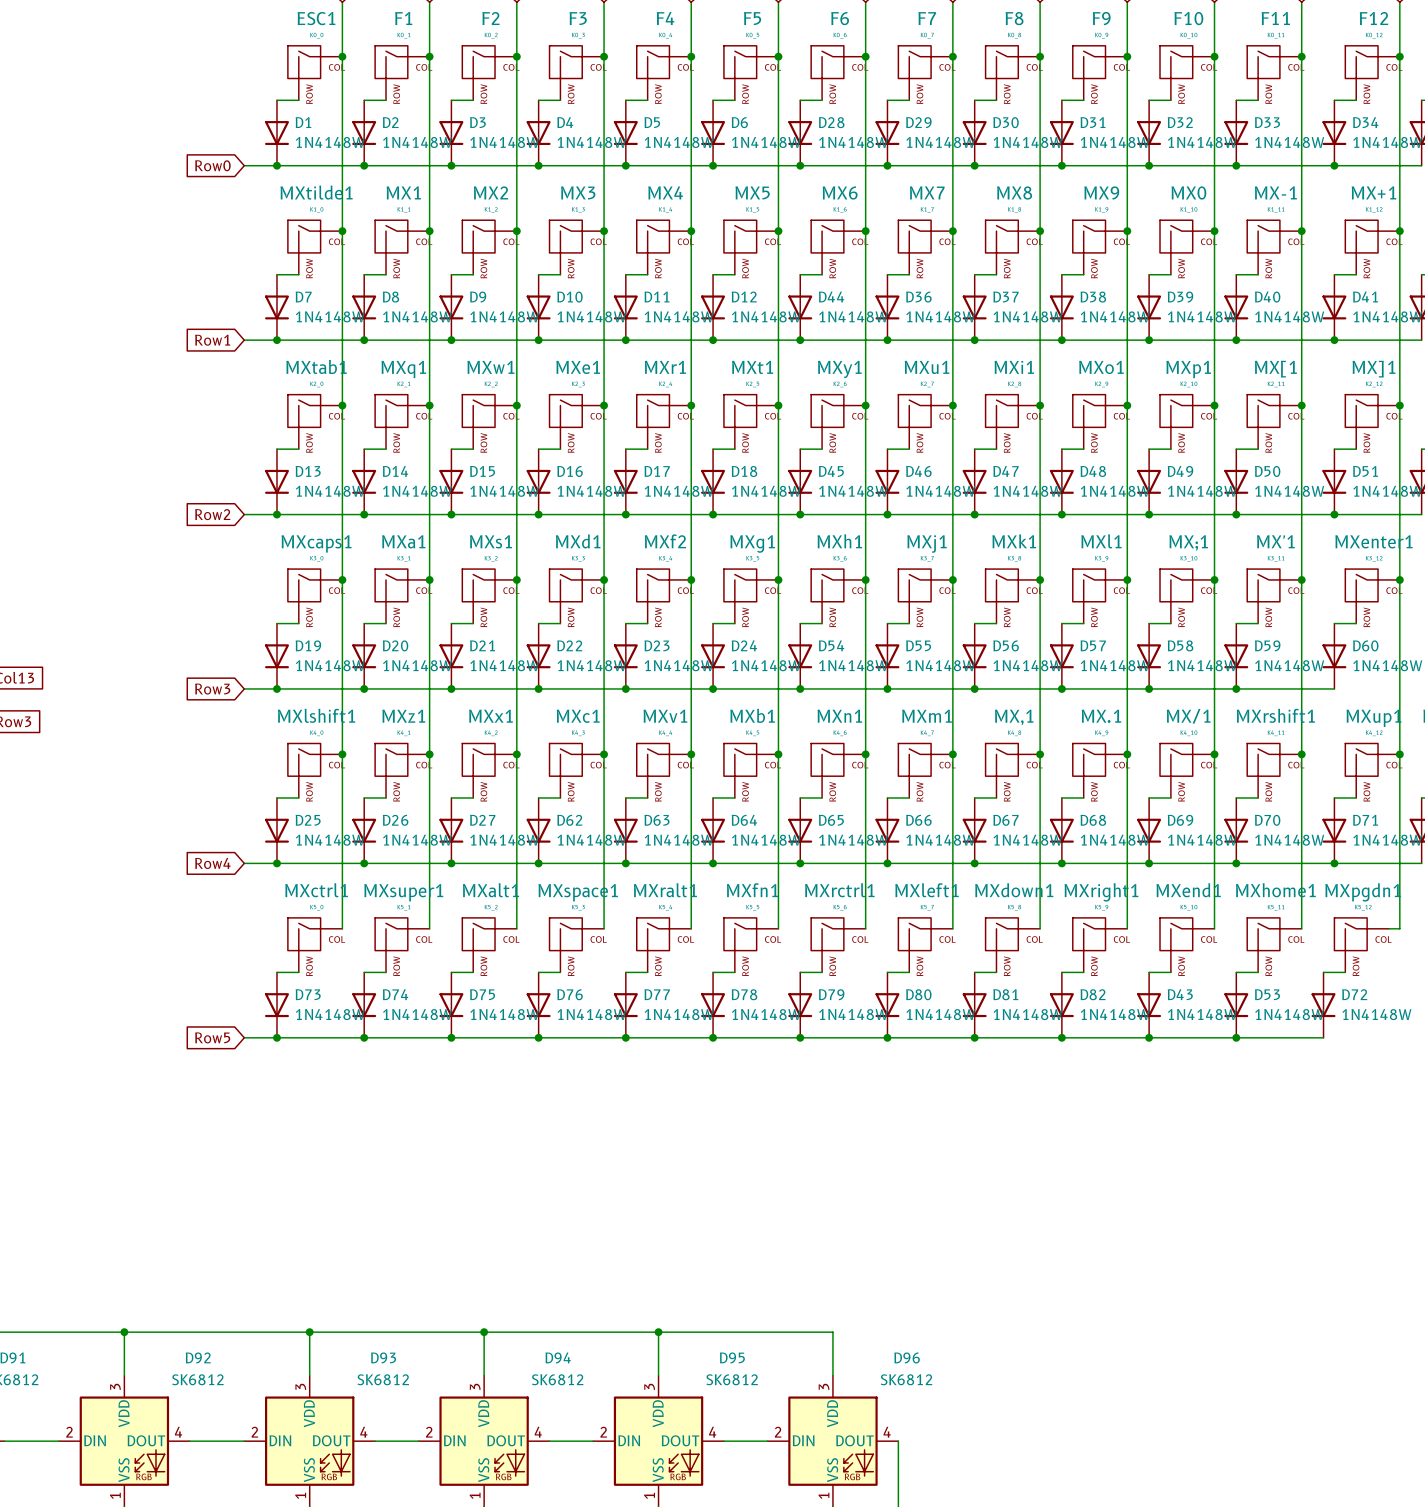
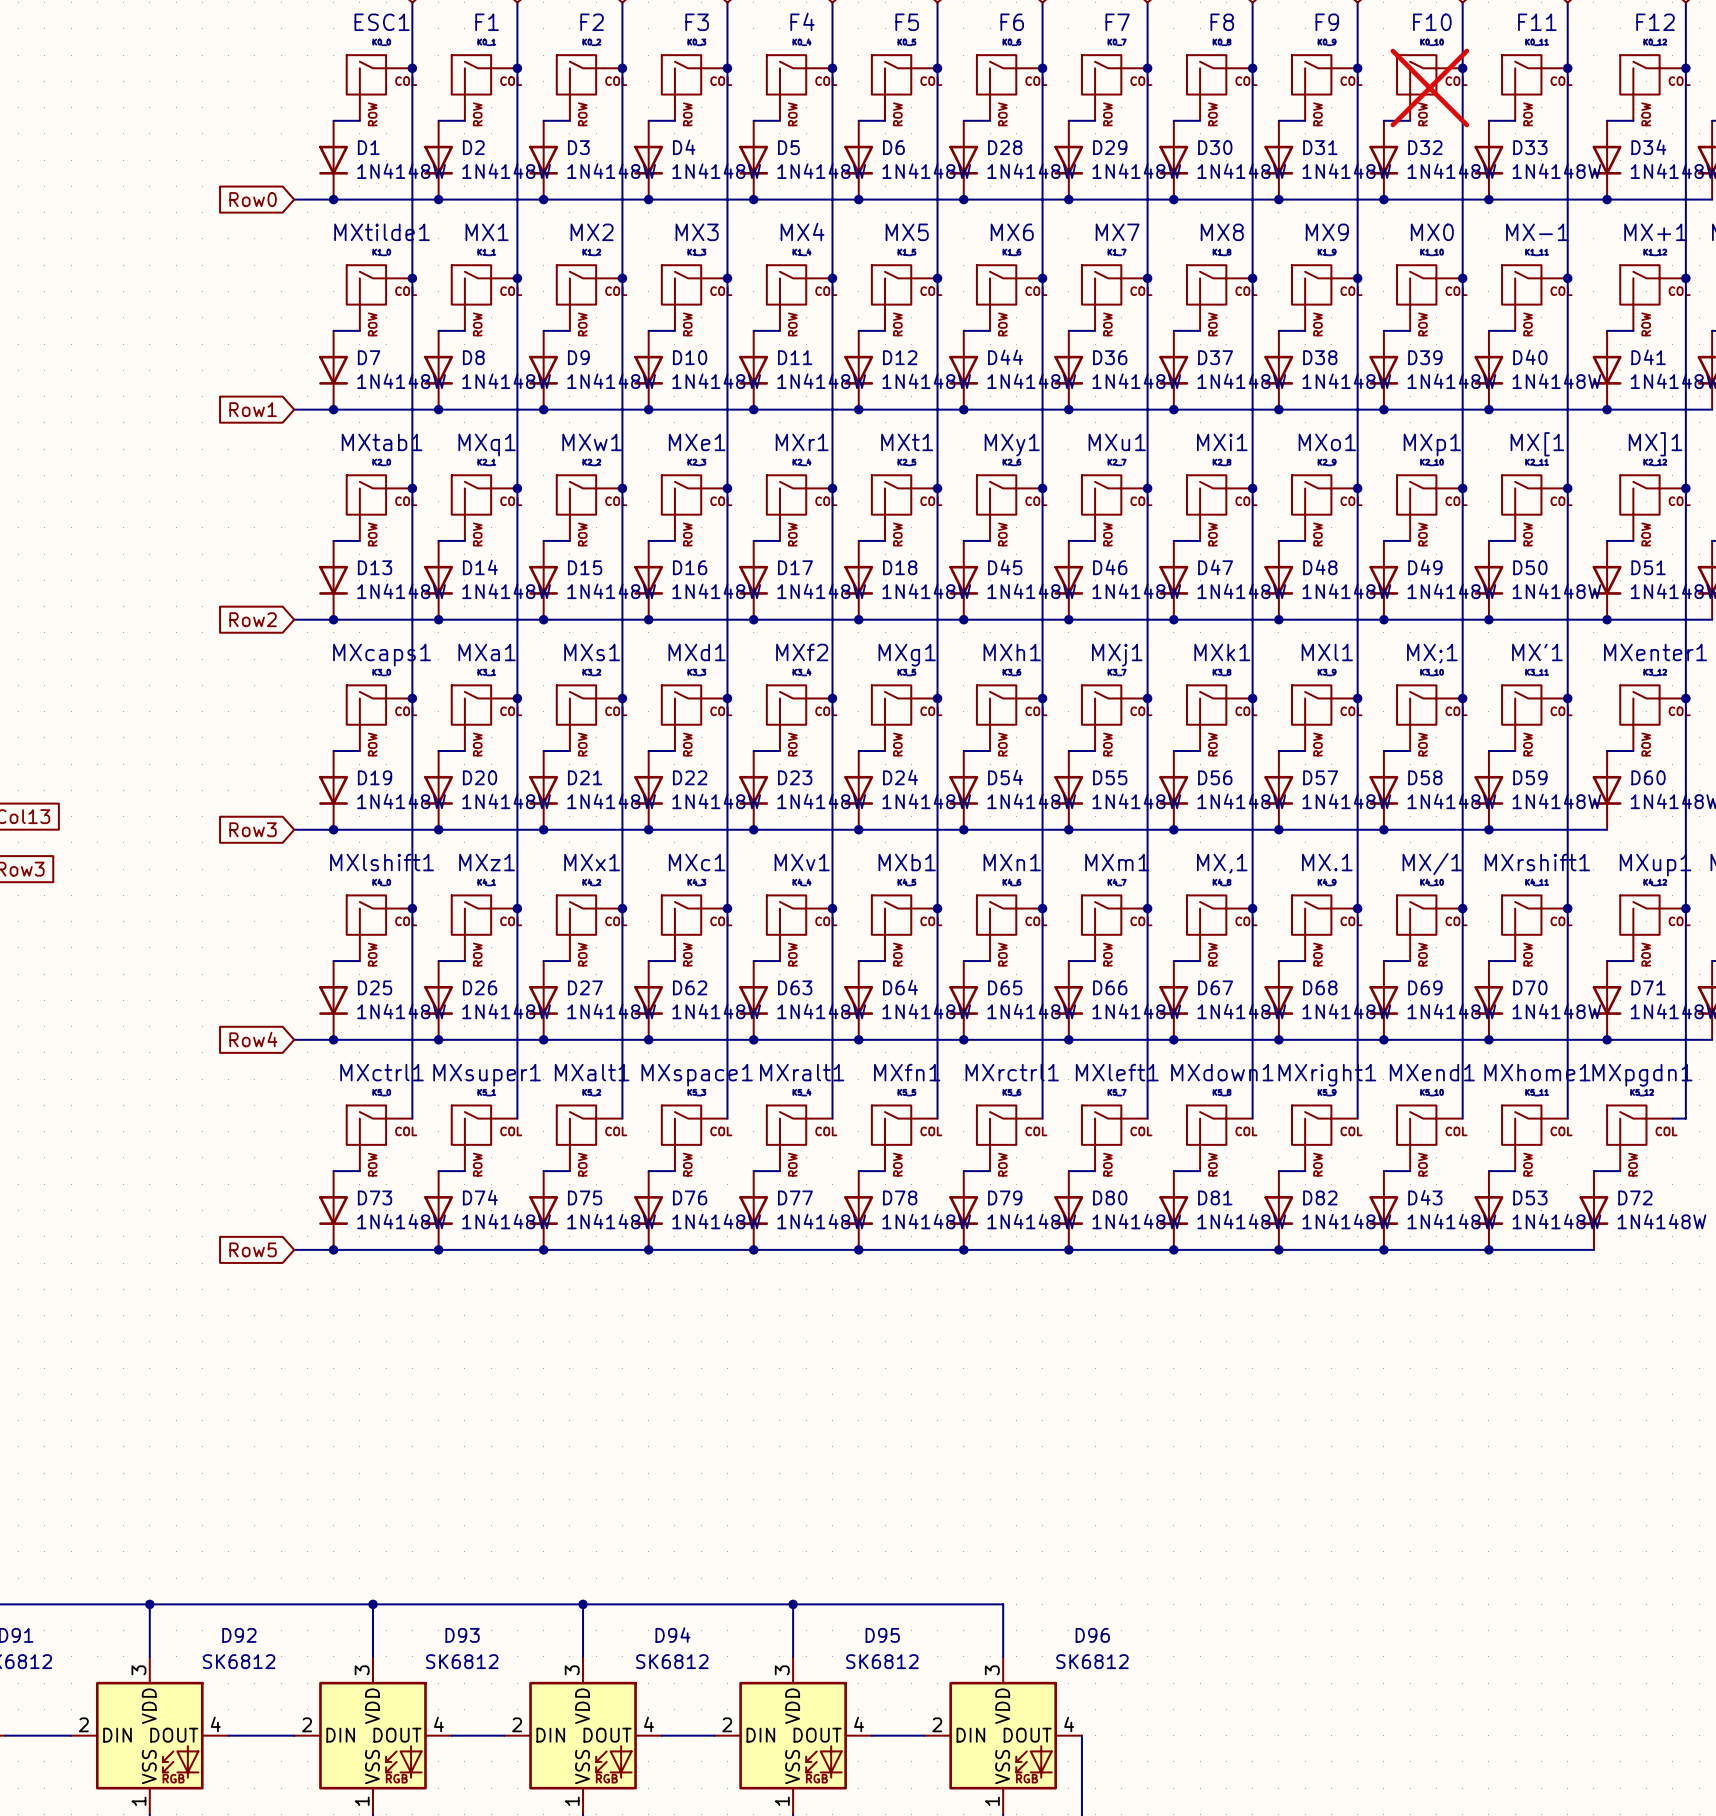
F10 do-not-place cross: none -> (1429, 87)

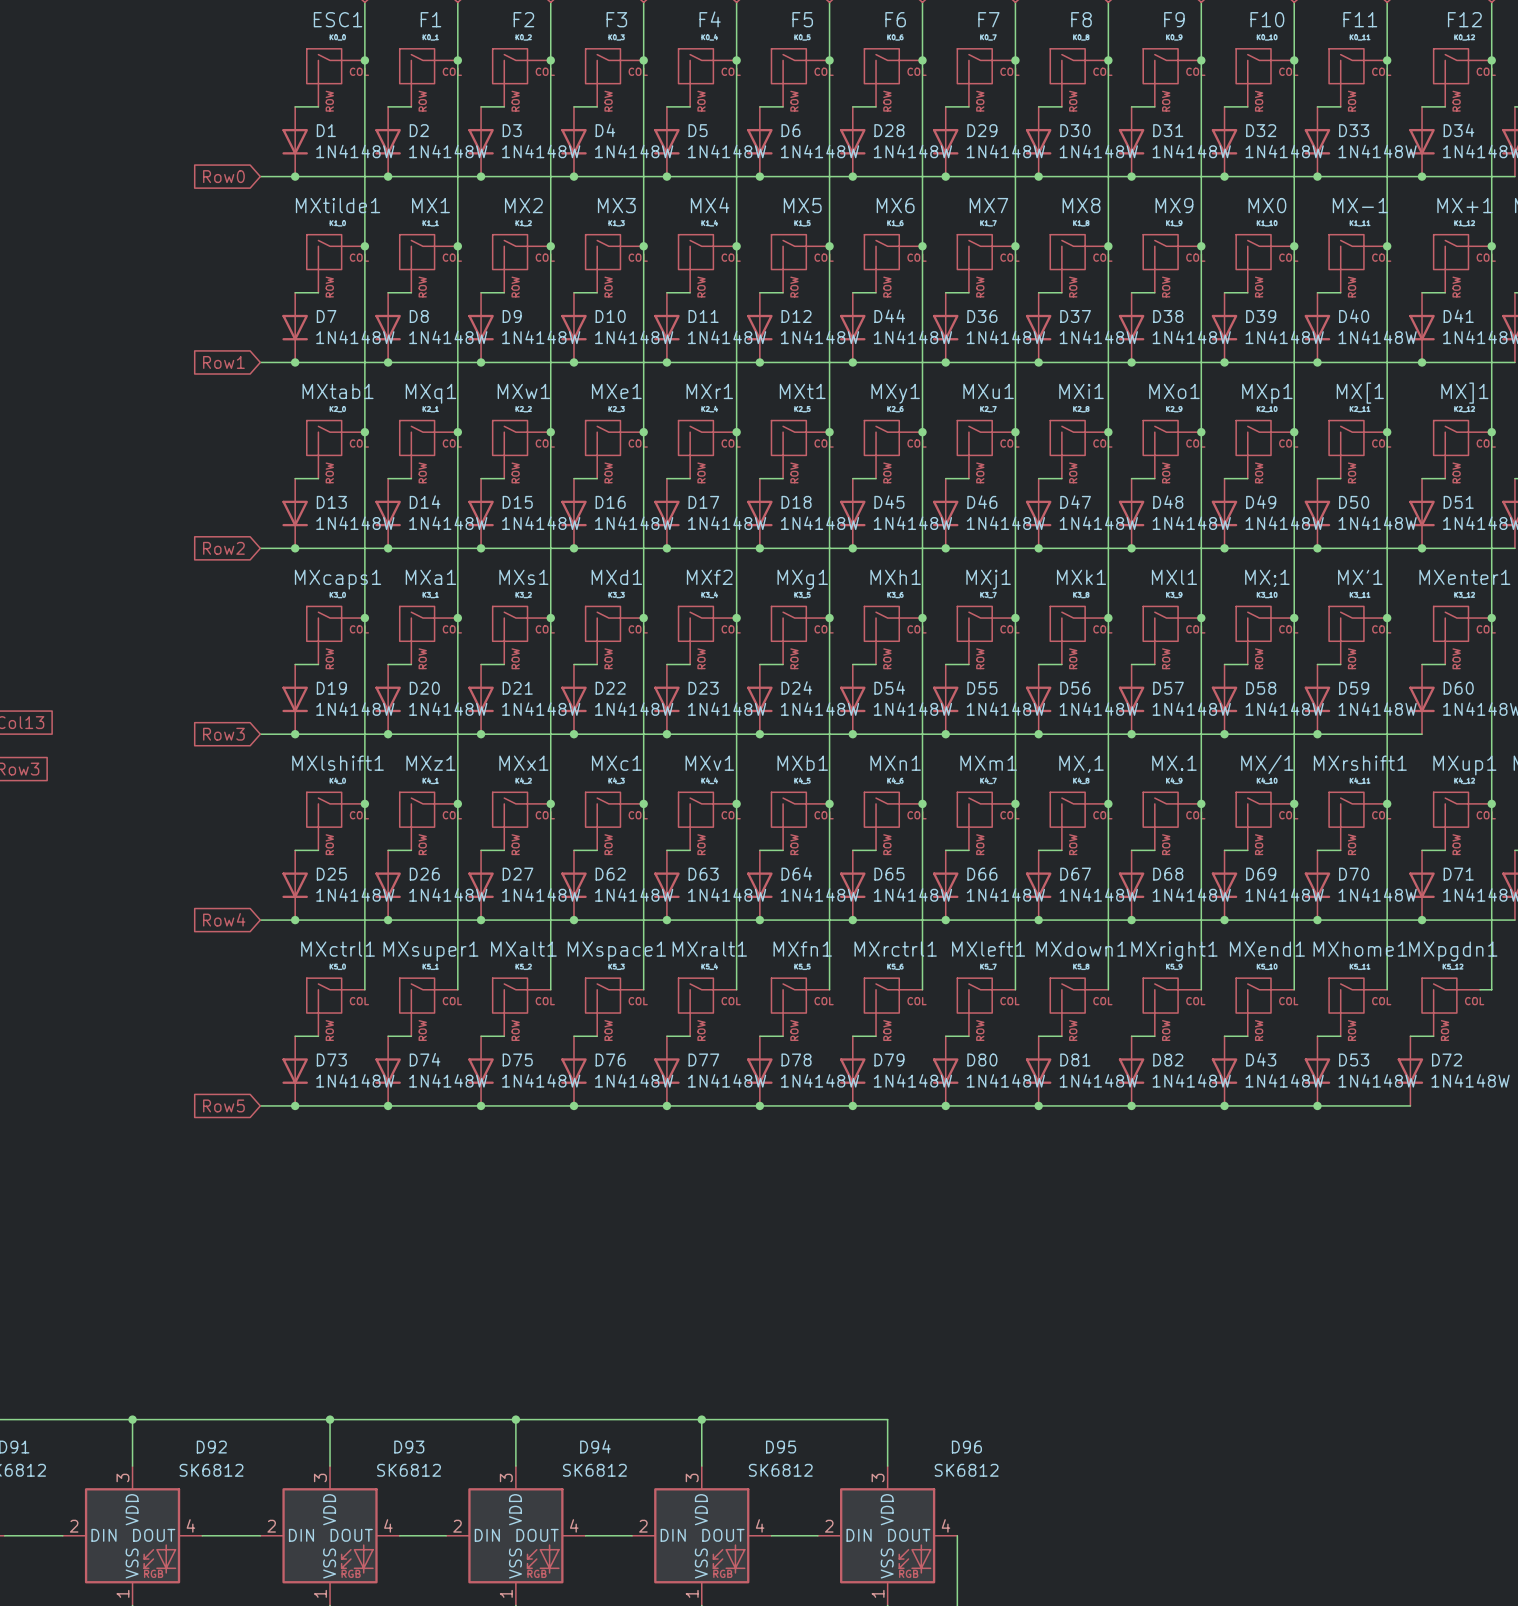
F10 do-not-place cross: (1429, 87) -> none

